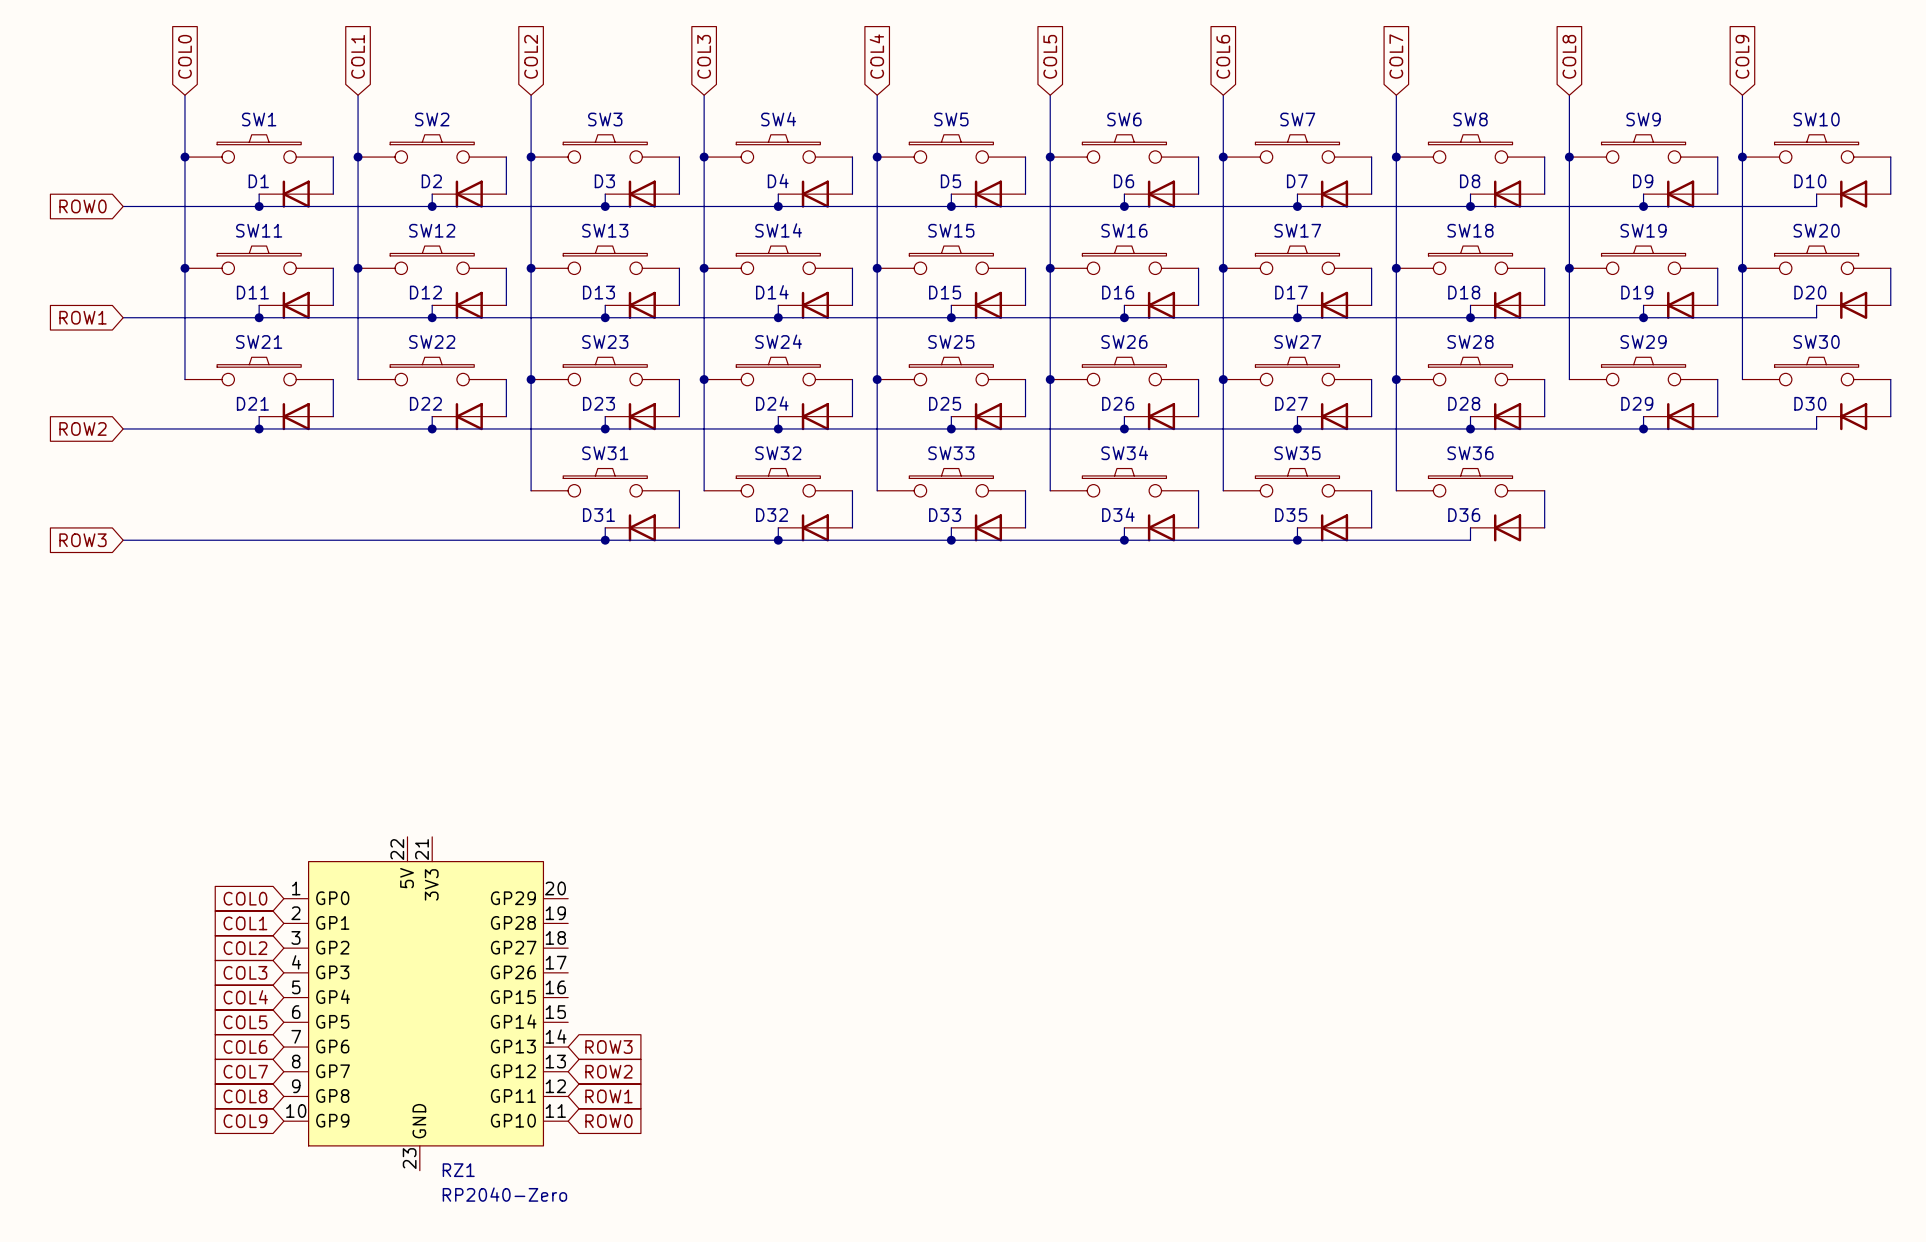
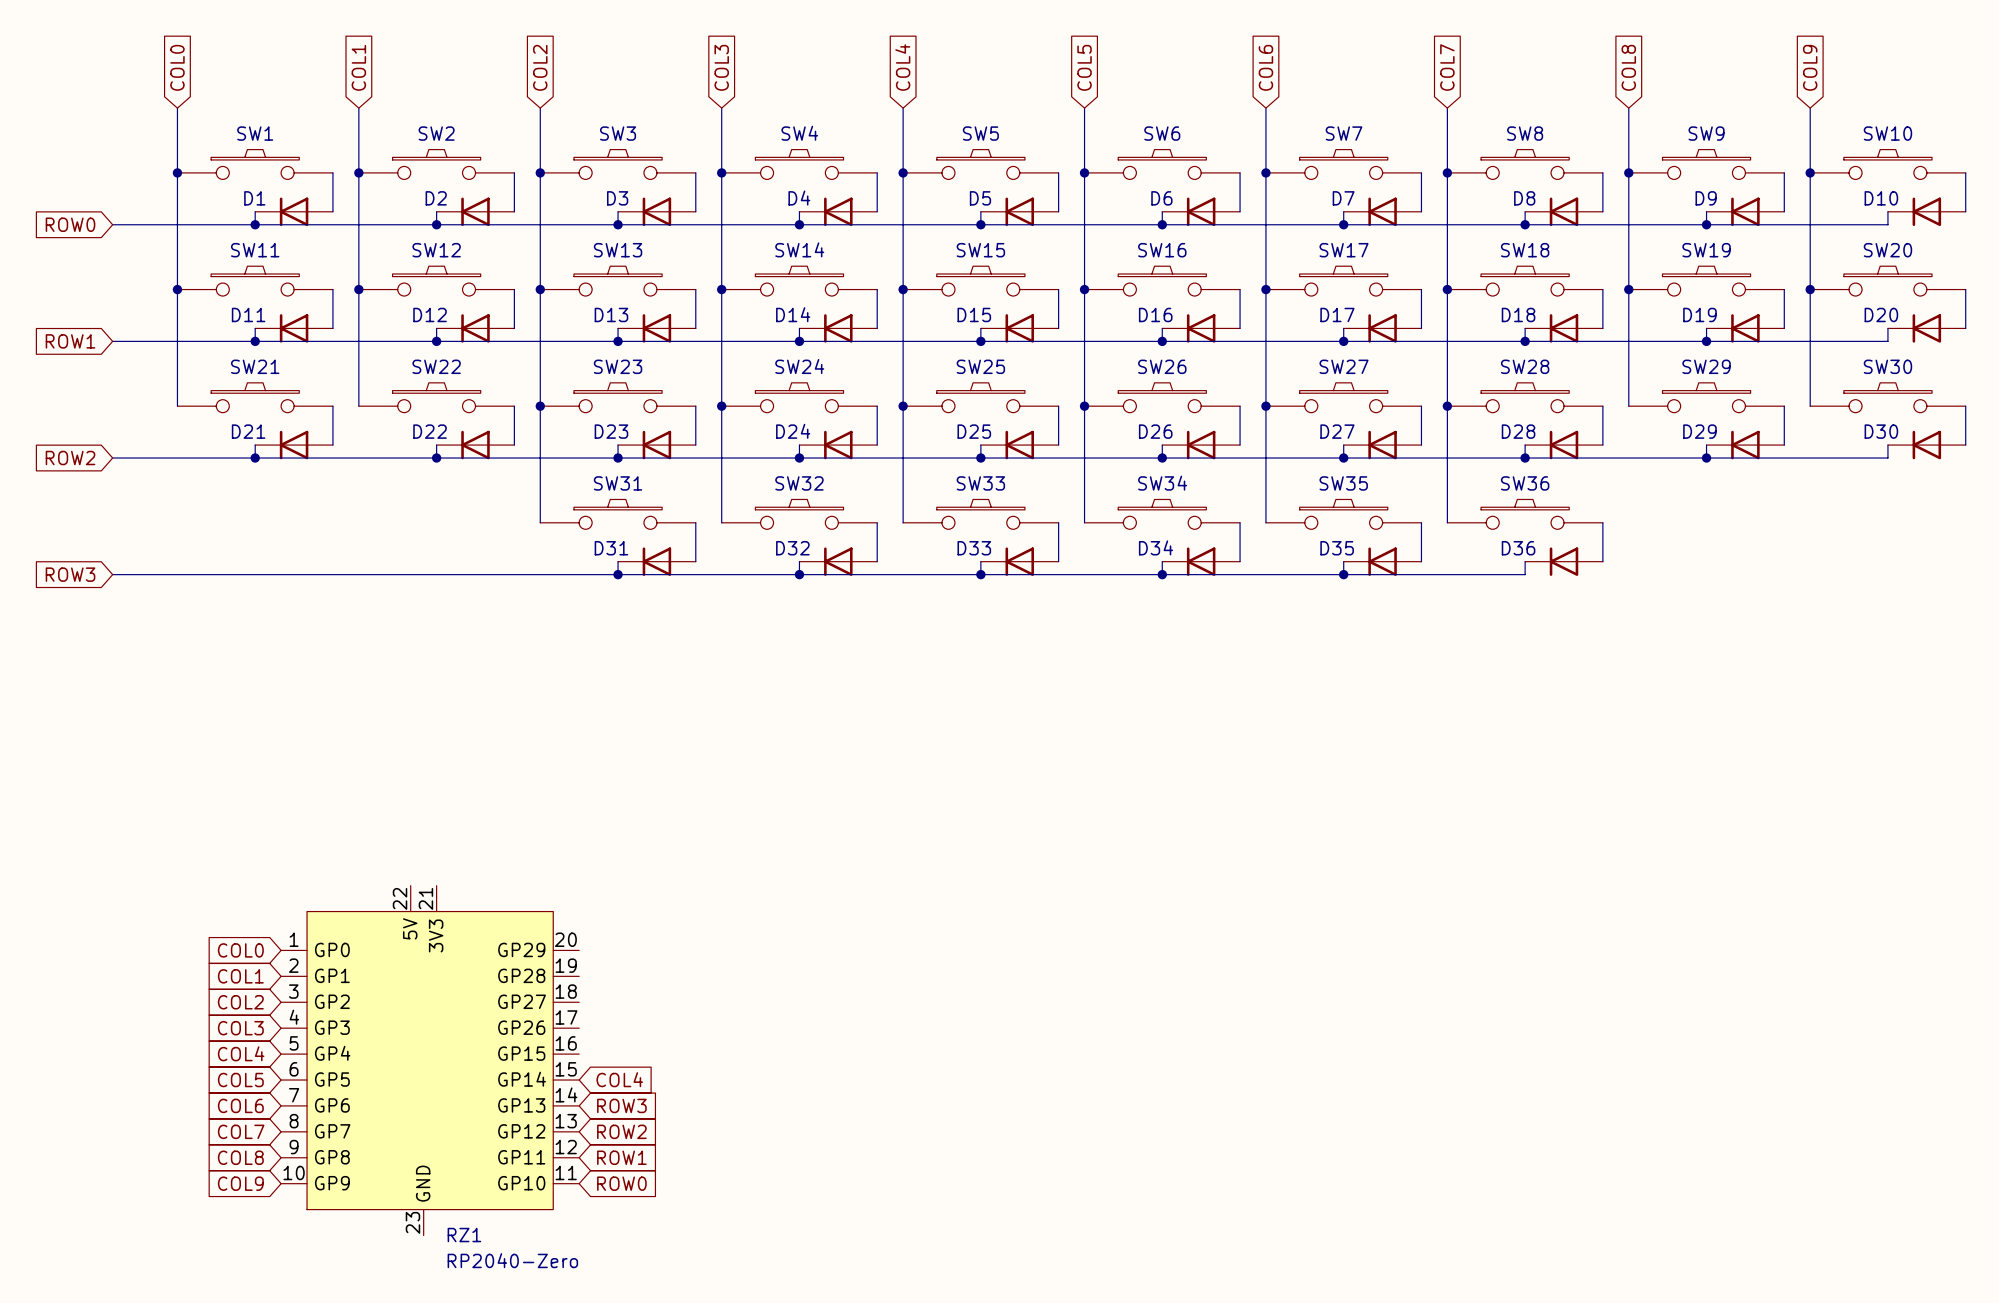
global label: none -> COL4 (619, 1079)

